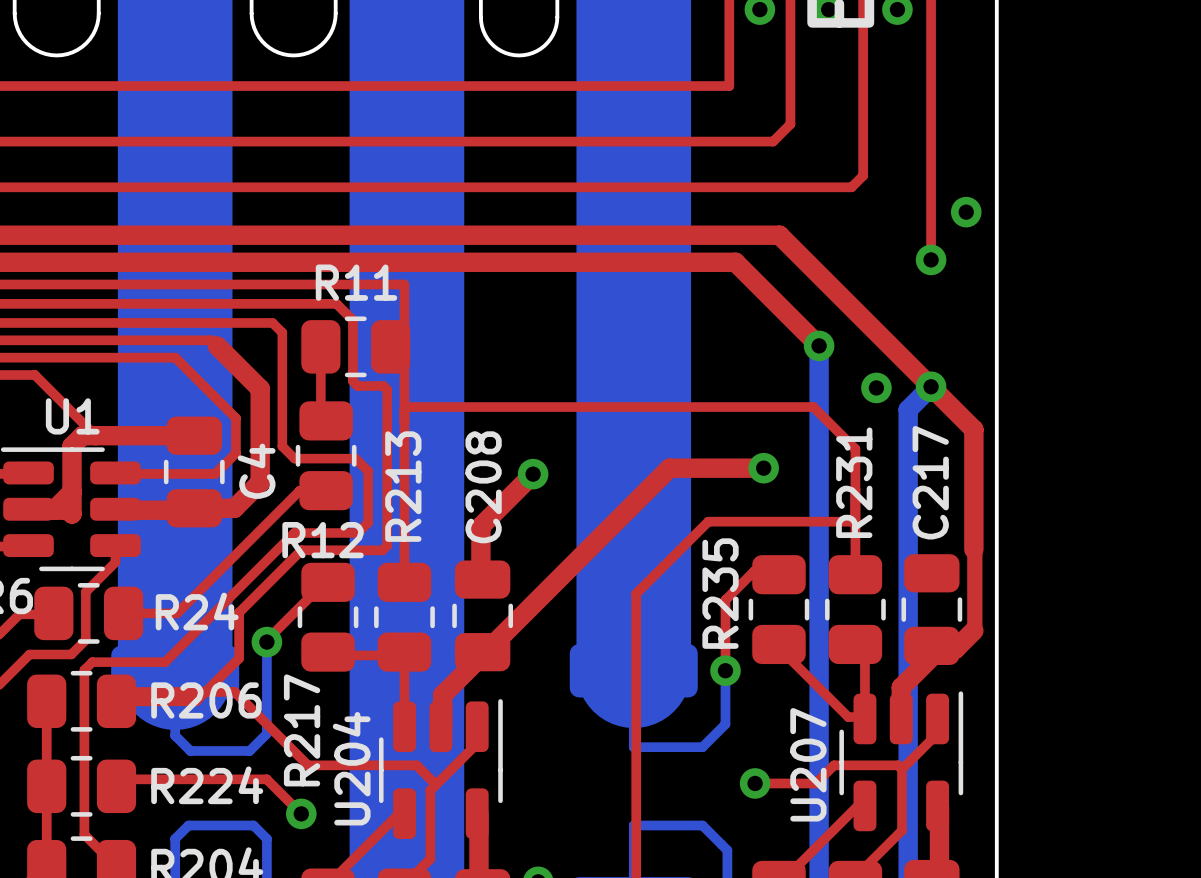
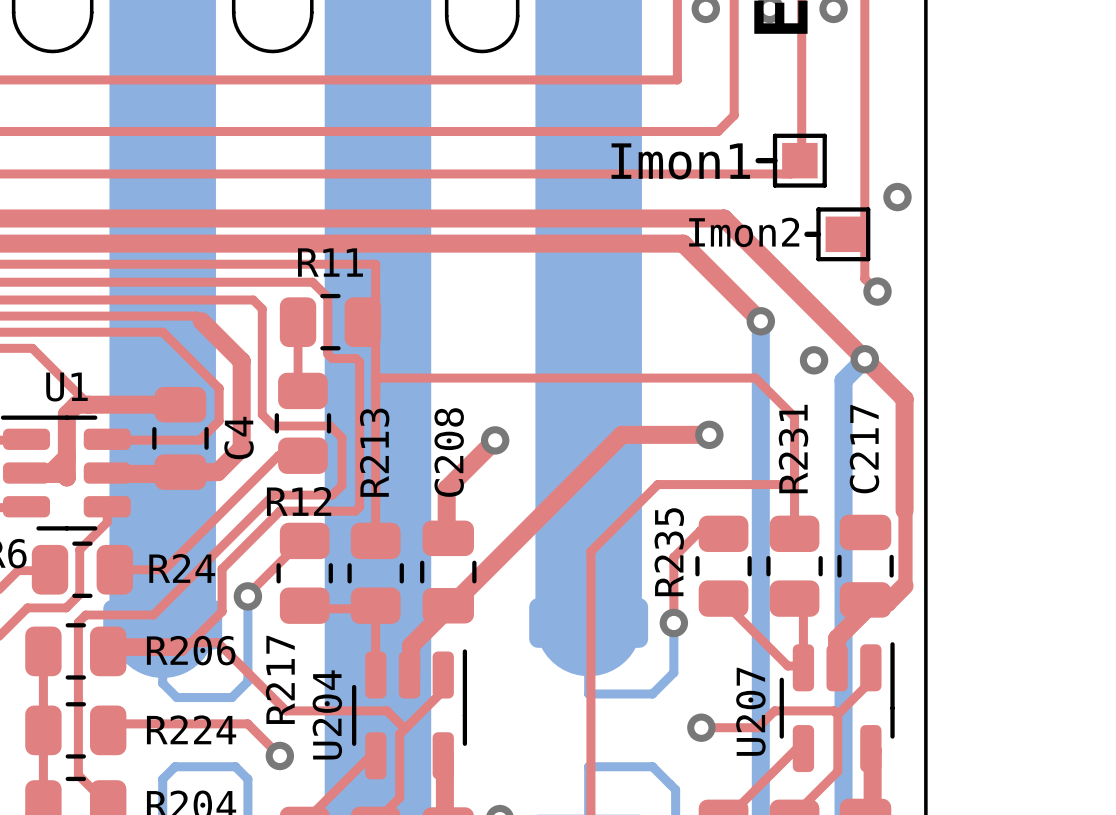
line: none -> (758, 160) (775, 160)
part: none -> Imon1 (799, 160)
line: none -> (806, 234) (818, 234)
part: none -> Imon2 (843, 234)
top track: none -> (864, 241) (864, 278) (877, 291)
via position: (931, 259) -> (877, 291)

